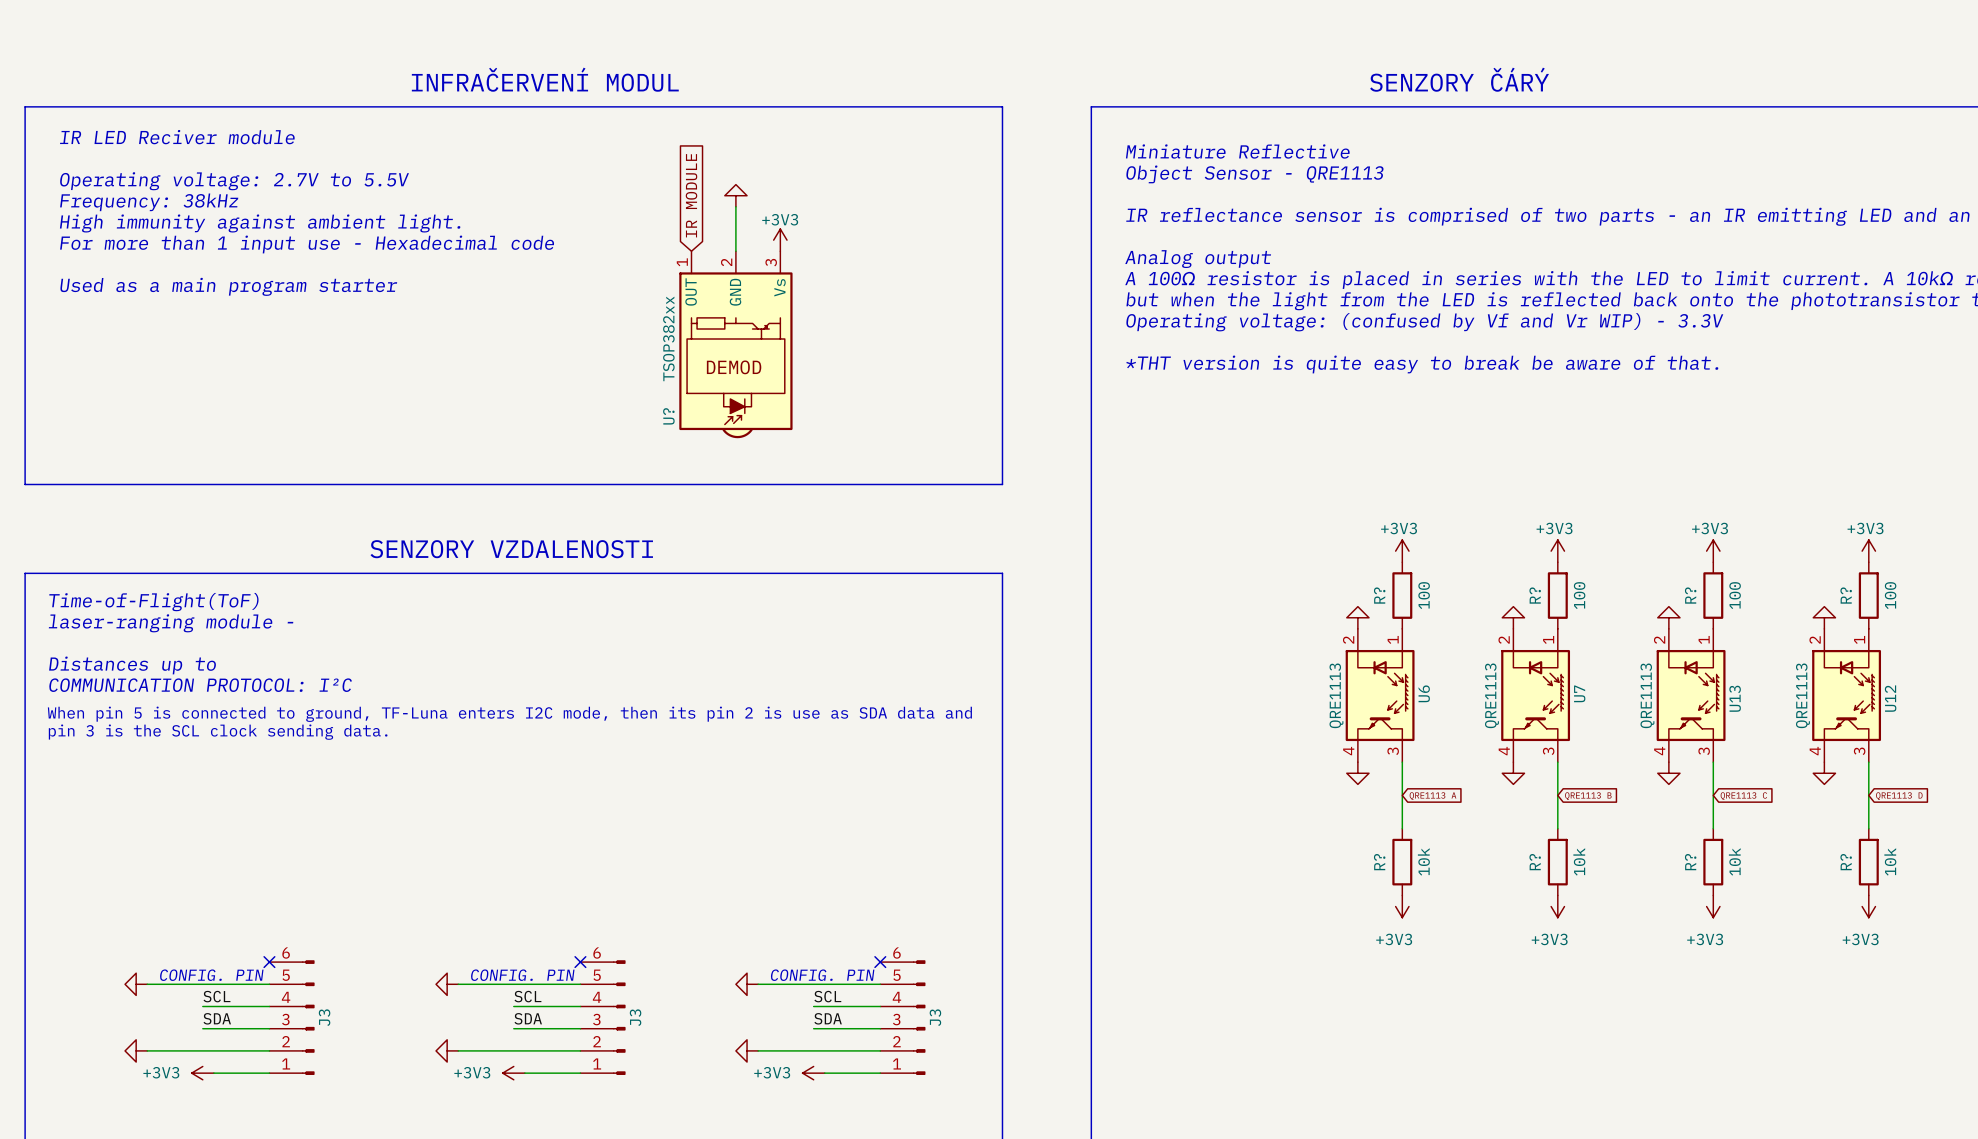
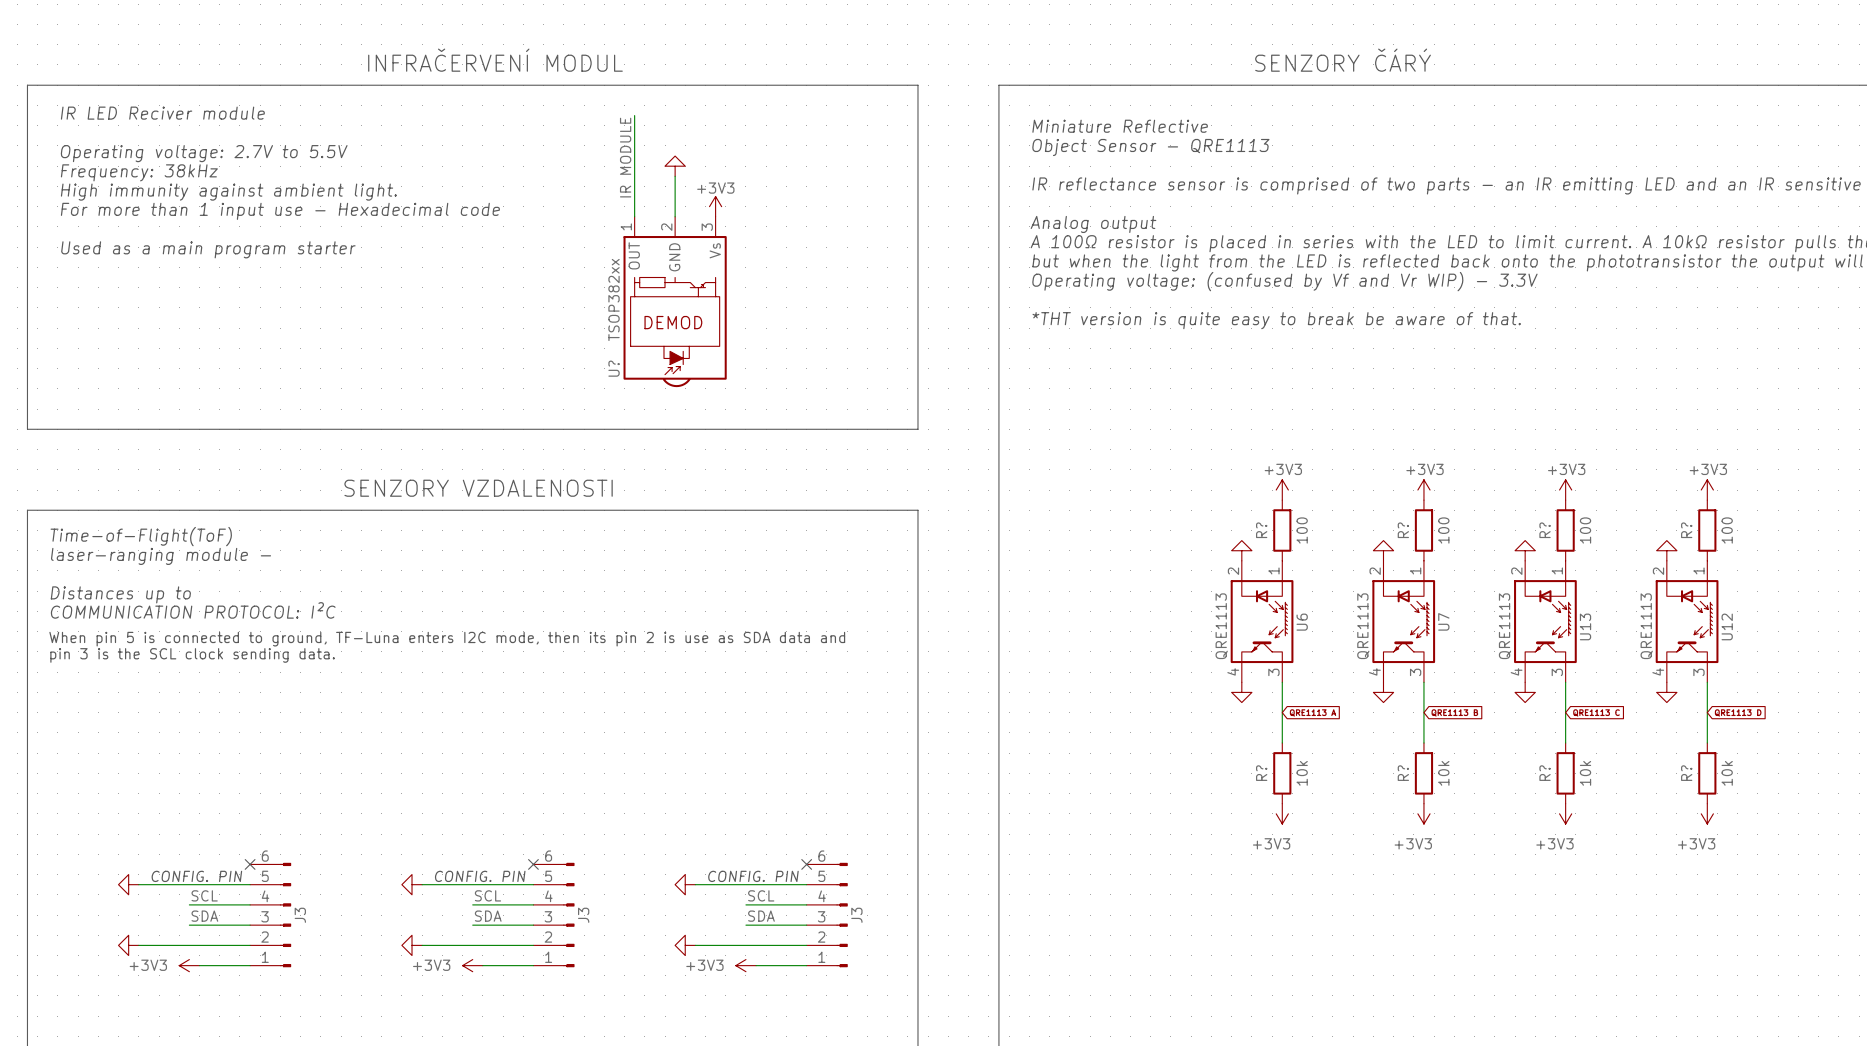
wire: none -> (634, 115) (634, 216)
label: none -> IR MODULE (625, 157)
global label: IR MODULE (691, 195) -> none

